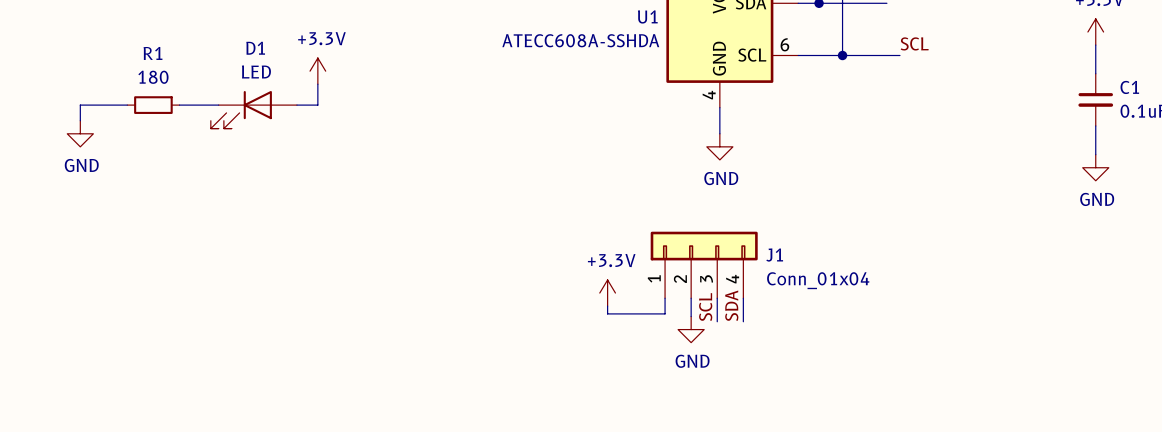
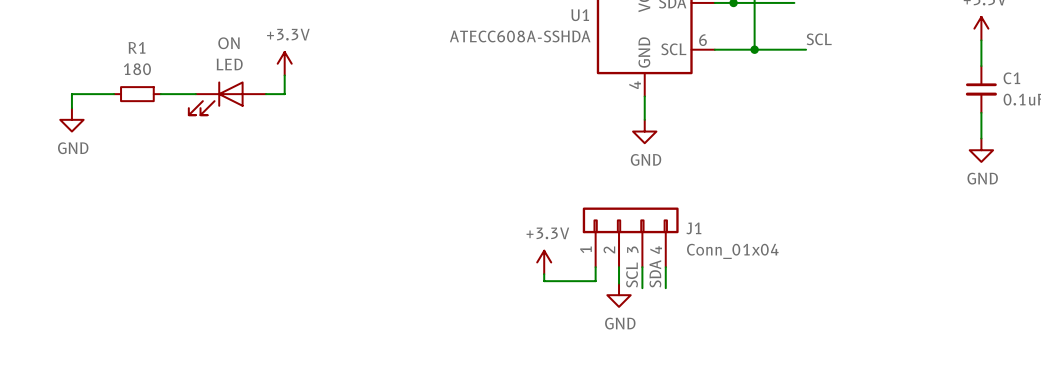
D1 name: D1 (255, 48) -> ON (228, 43)

